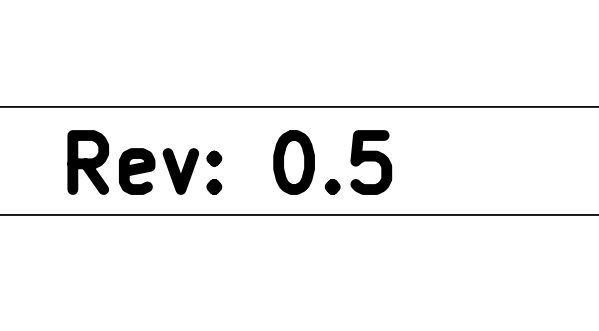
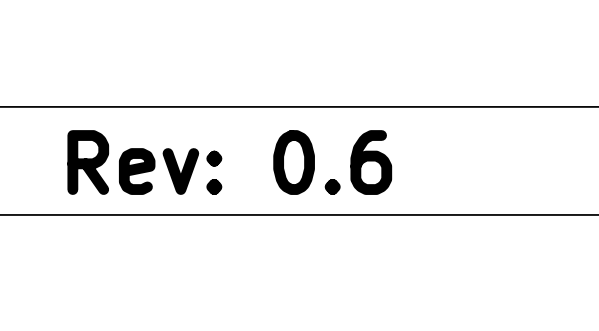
title block: Rev: 0.5 (229, 162) -> Rev: 0.6 (229, 162)

